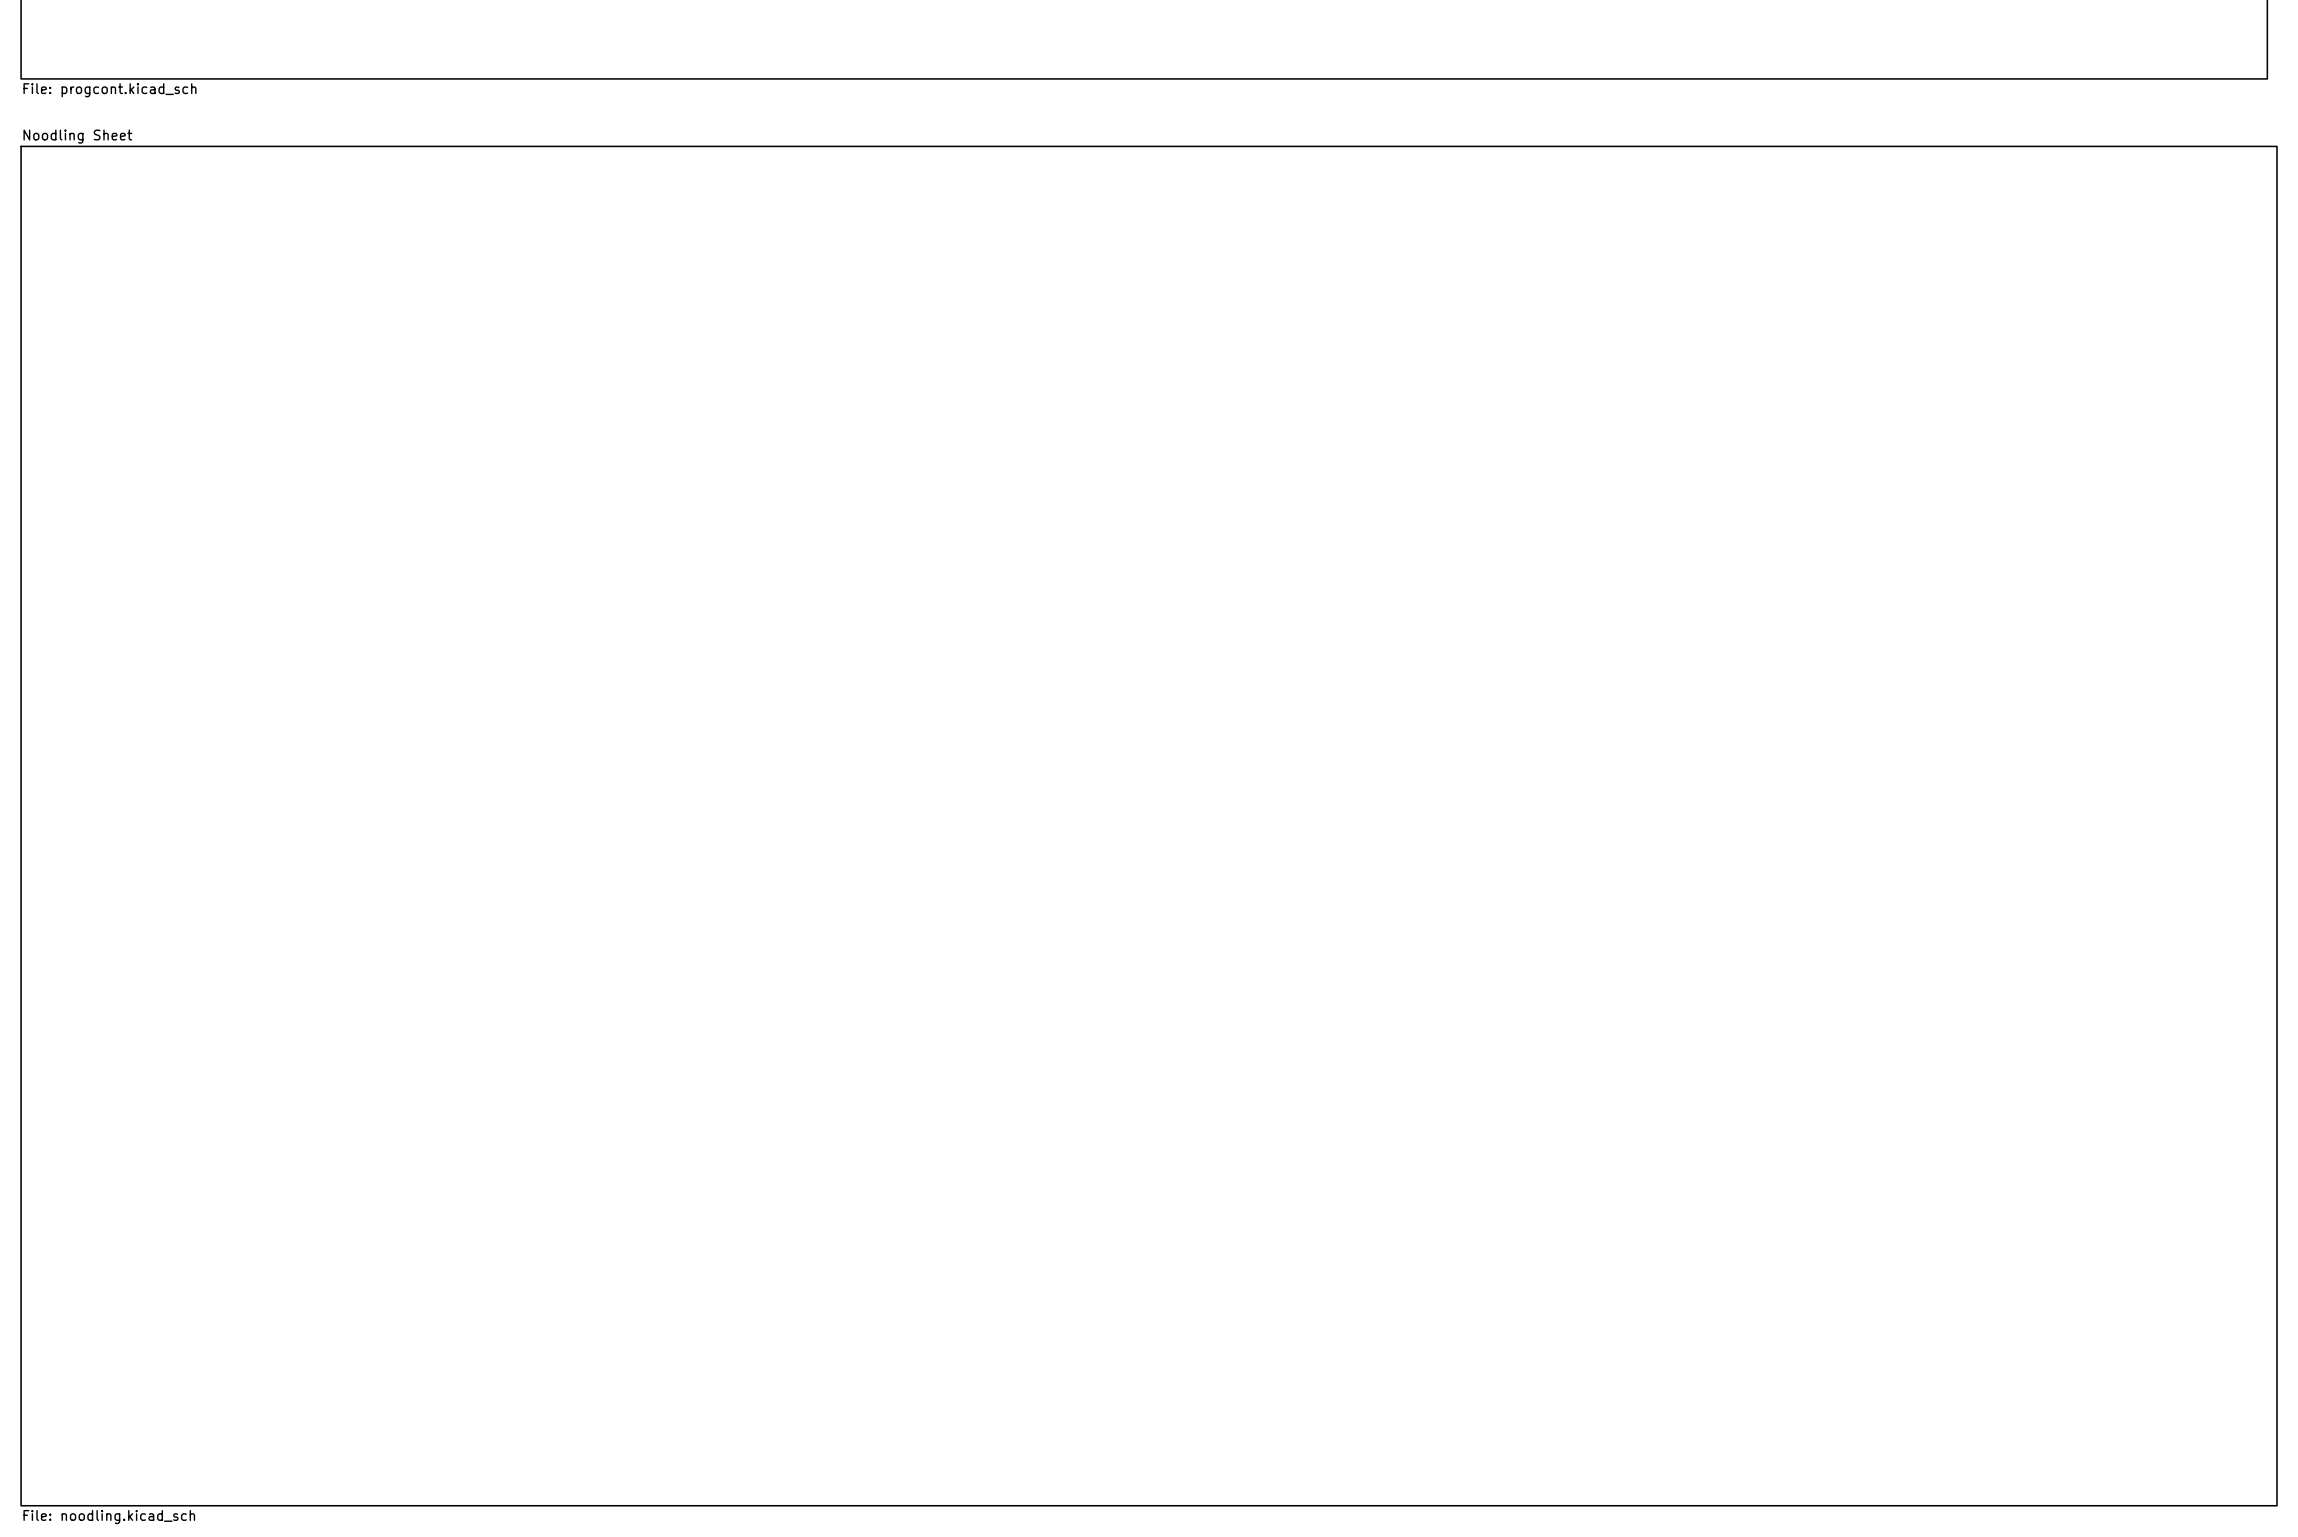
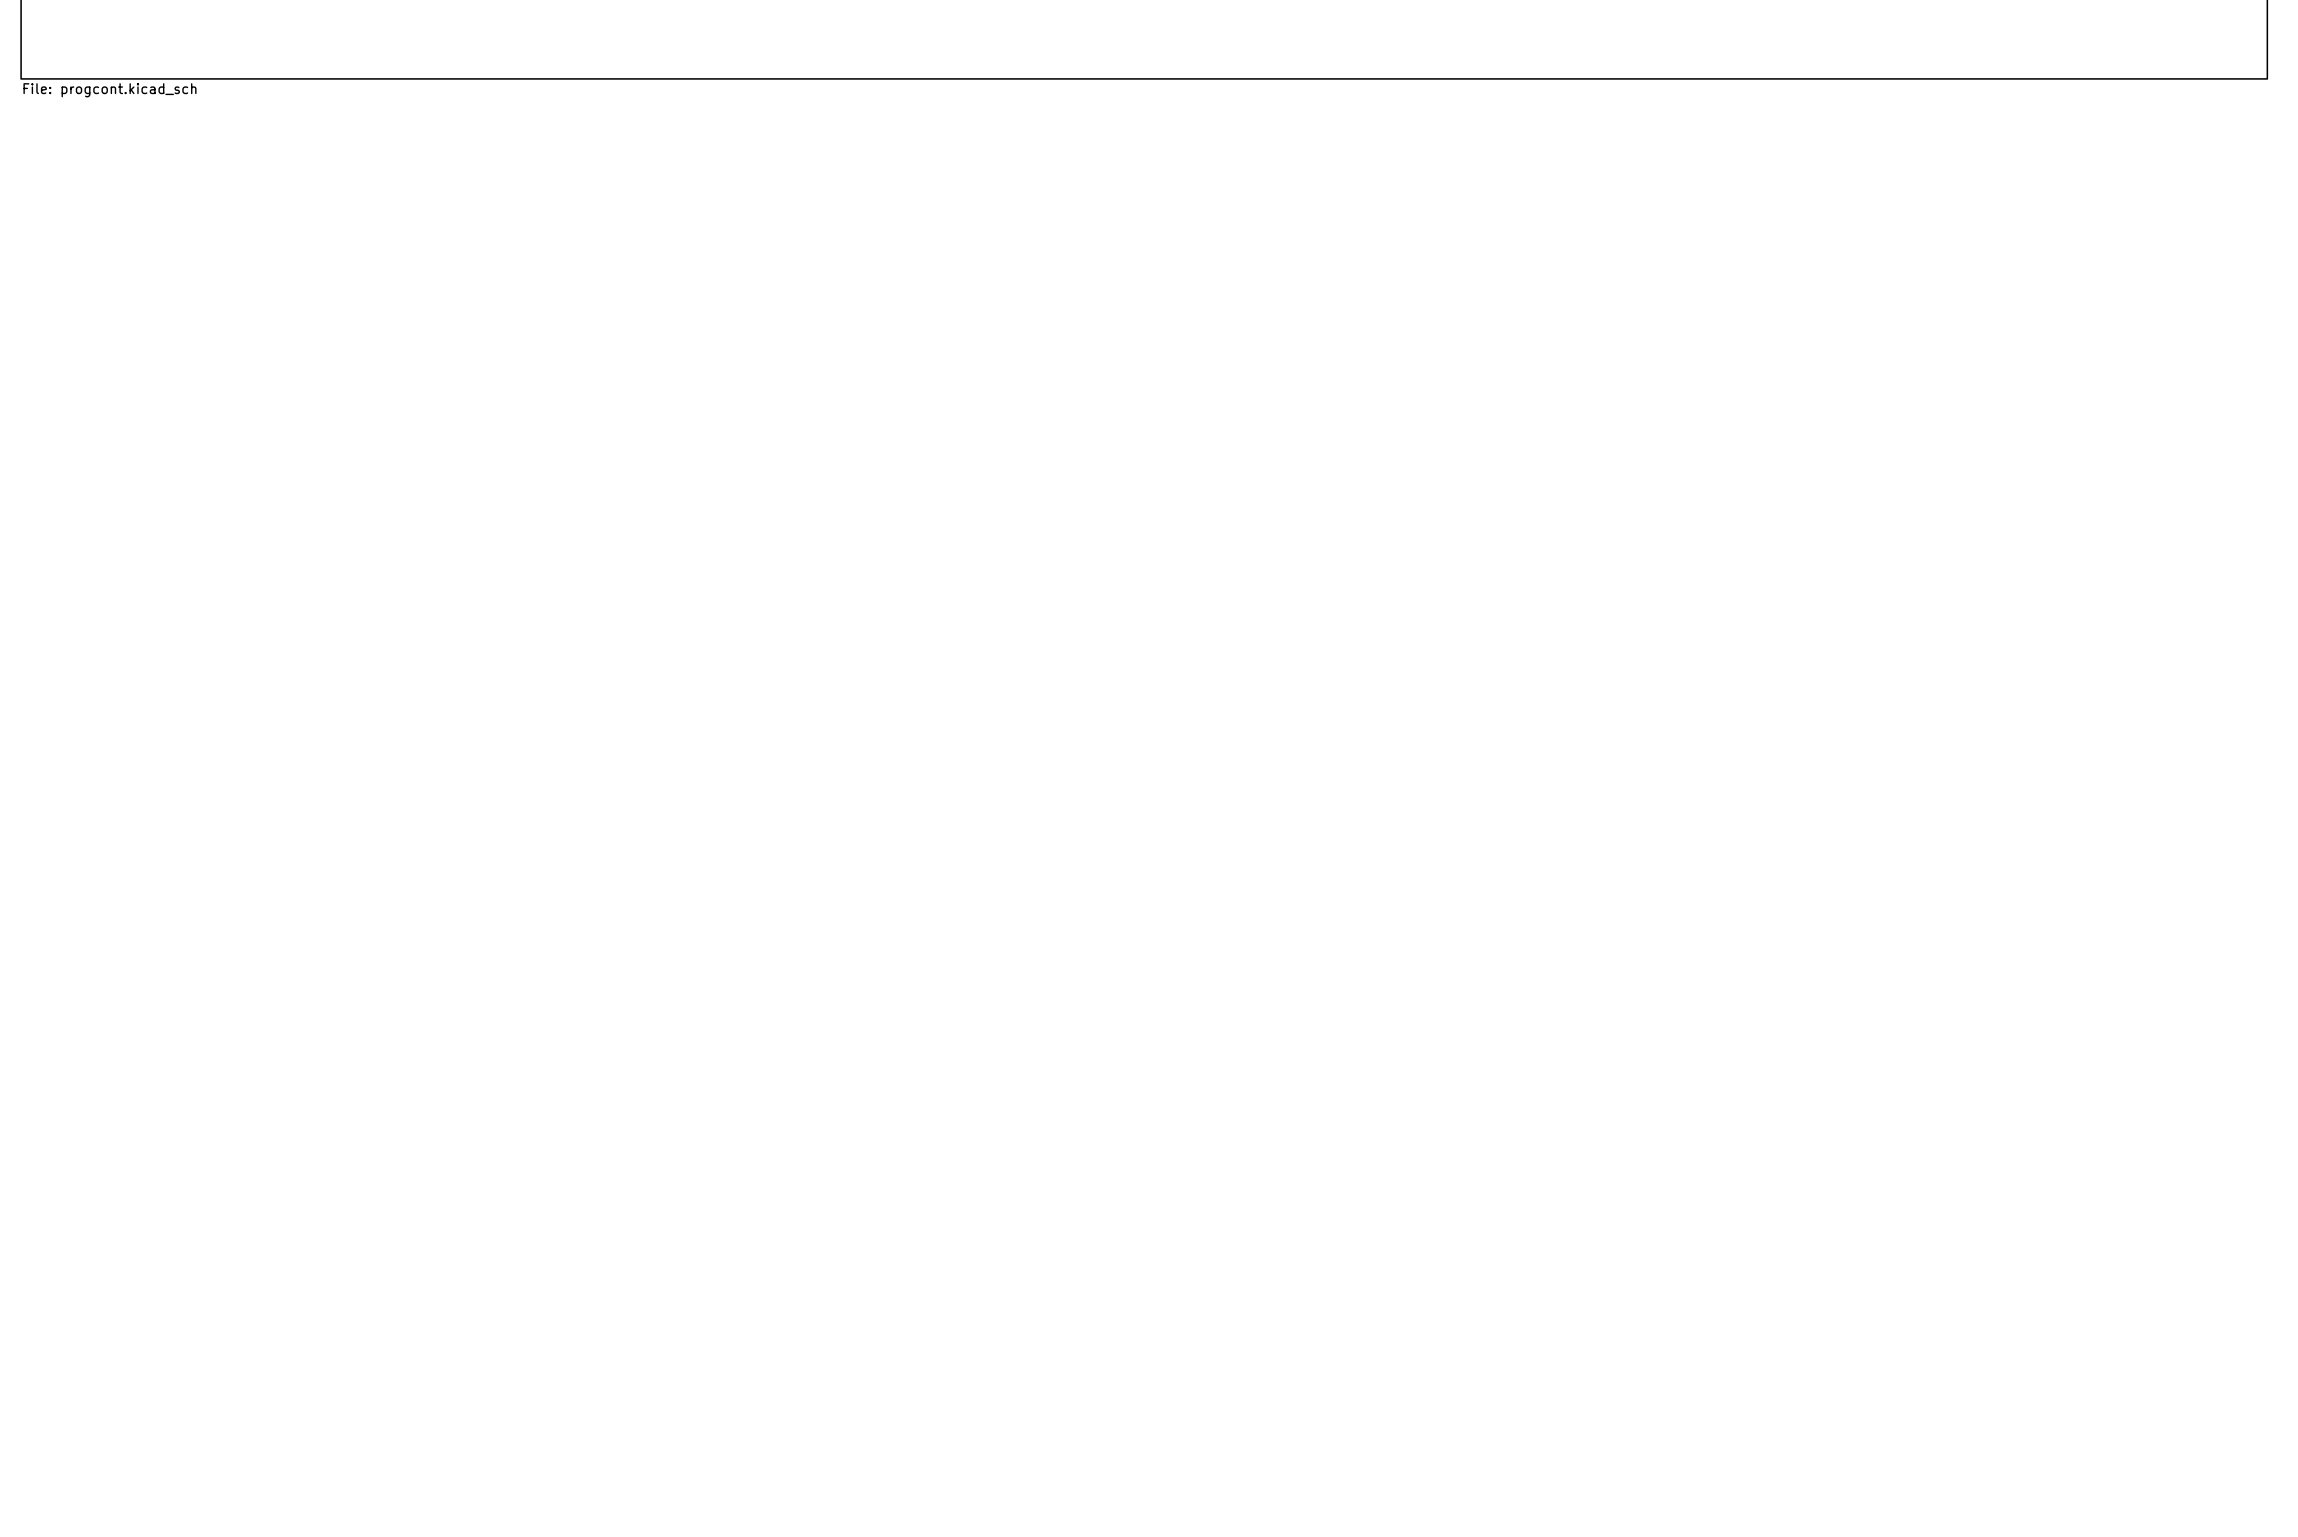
sheet Noodling Sheet: File: noodling.kicad_sch (1149, 826) -> none

